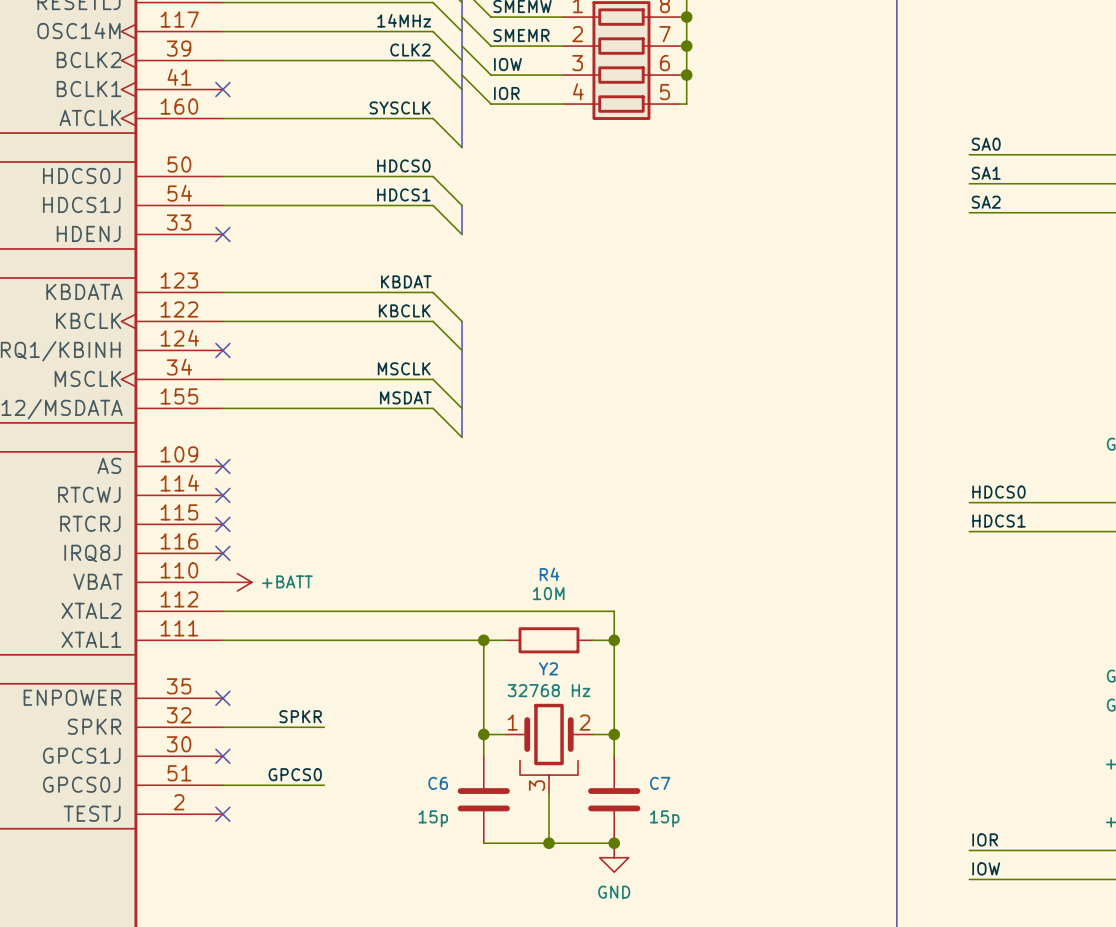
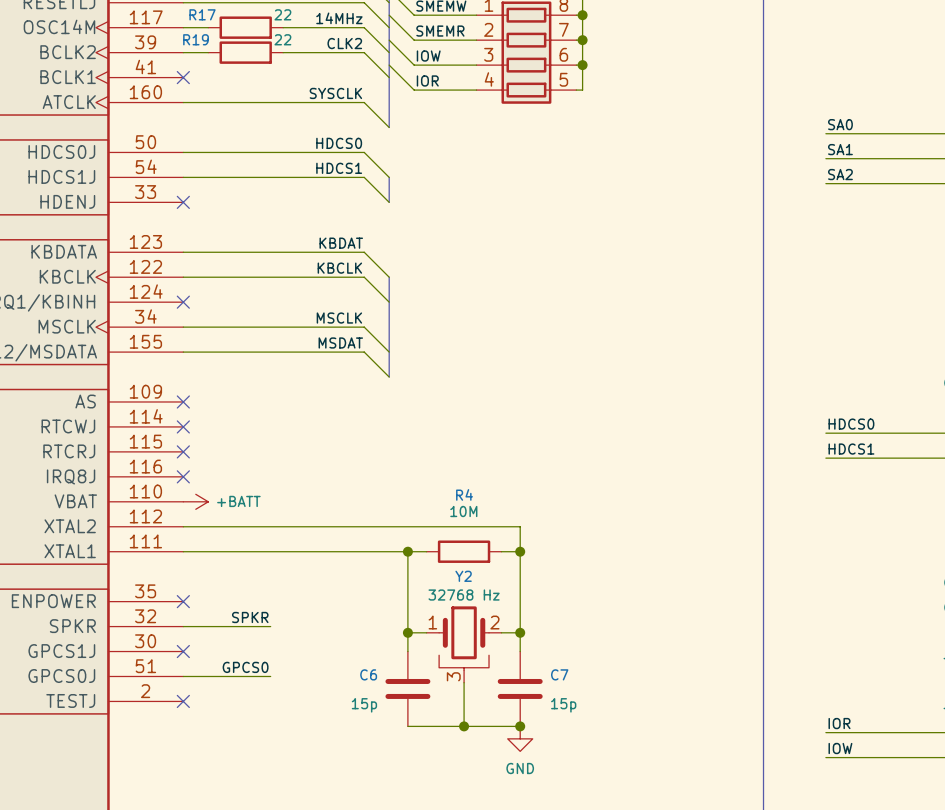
wire: (251, 31) (338, 31) -> none
R17: none -> 22 (245, 27)
wire: (251, 60) (338, 60) -> none
R19: none -> 22 (245, 52)

